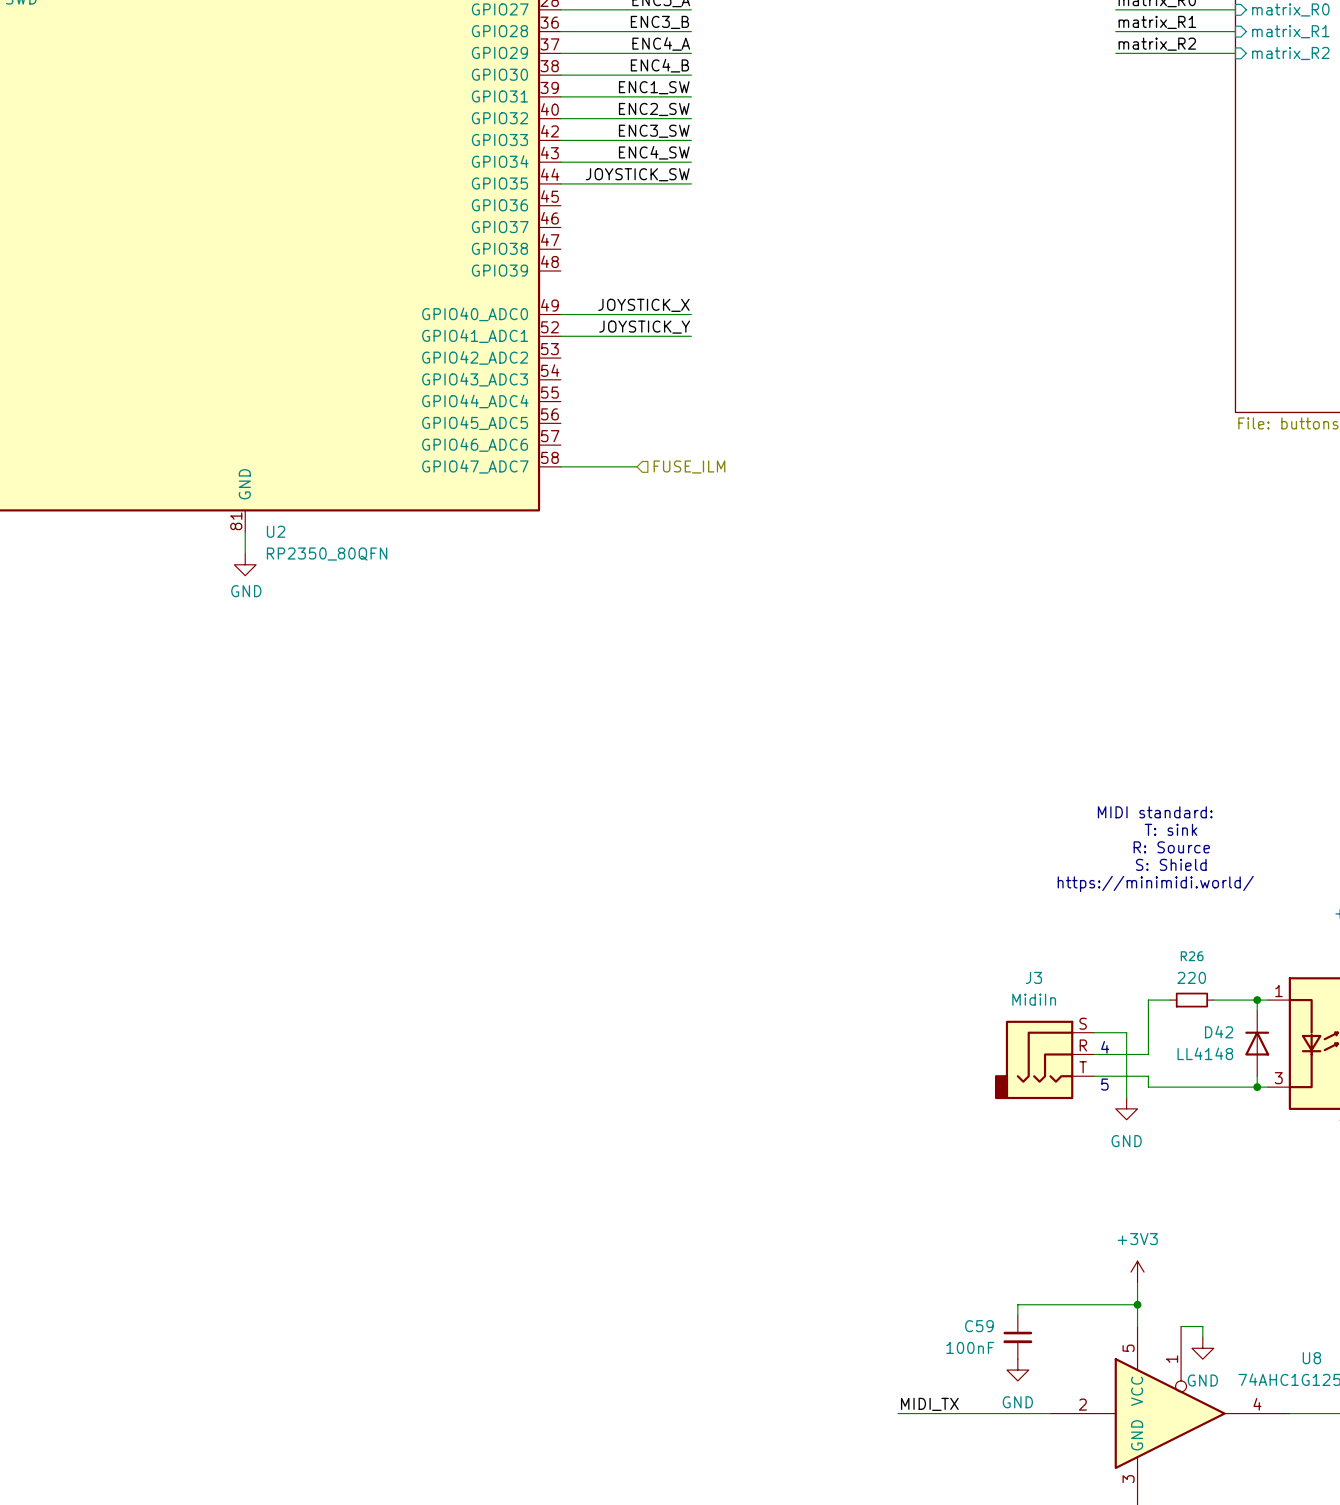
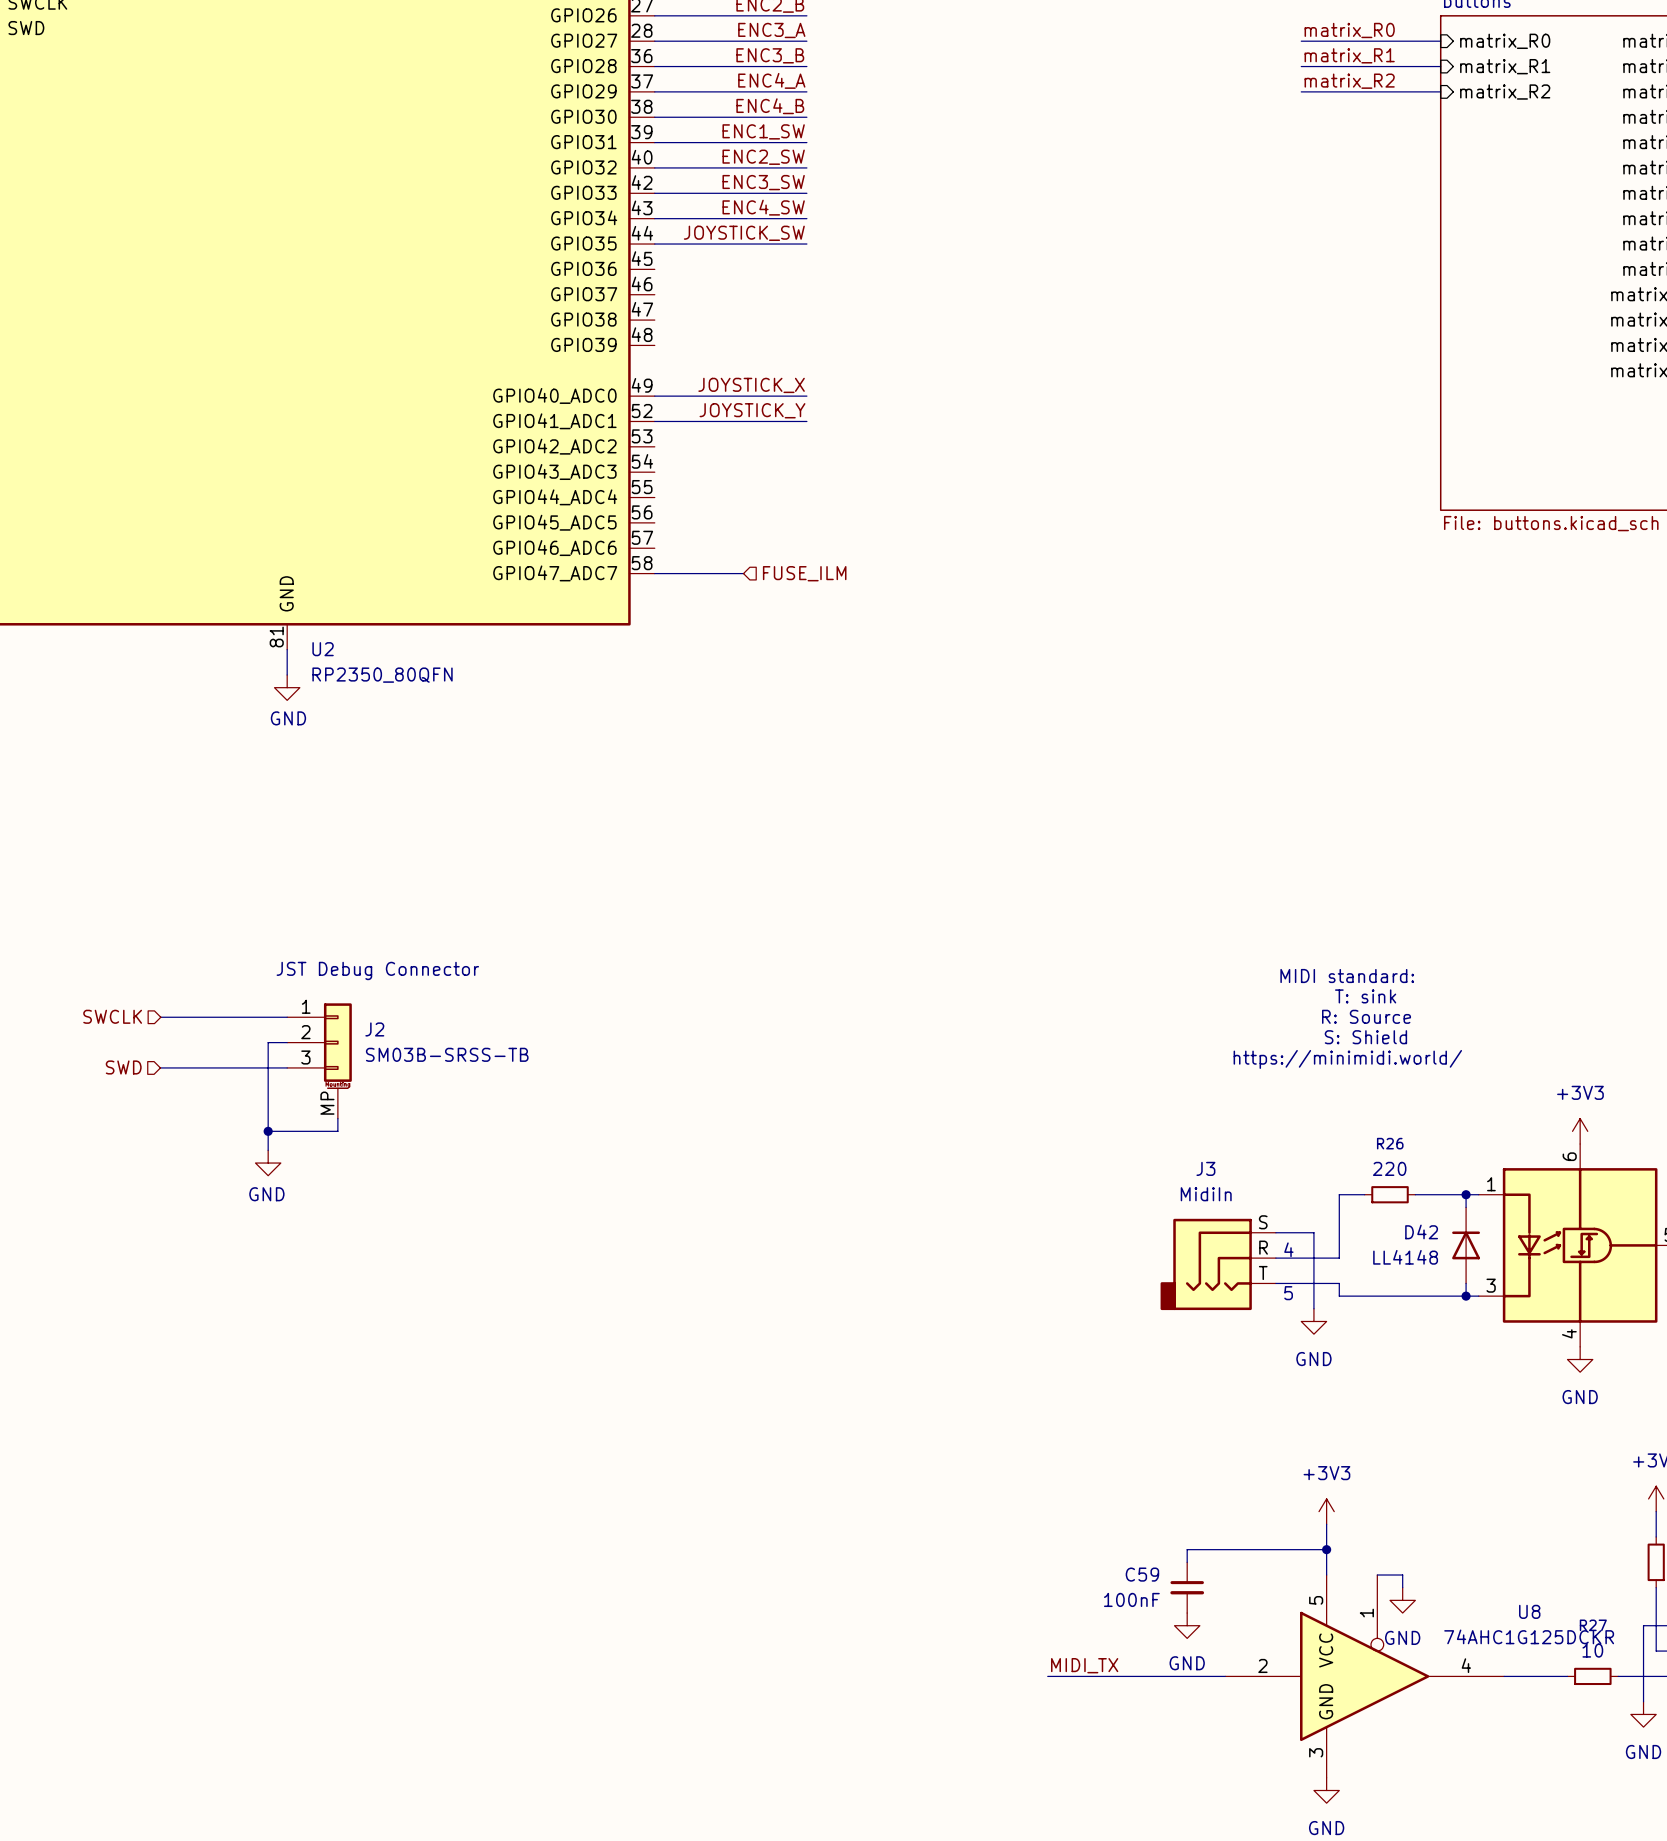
text: none -> JST Debug Connector (377, 970)
hierarchical label: none -> SWCLK (112, 1016)
wire: none -> (160, 1017) (287, 1017)
wire: none -> (287, 1042) (268, 1042) (268, 1150)
J2: none -> SM03B-SRSS-TB (319, 1060)
hierarchical label: none -> SWD (123, 1067)
wire: none -> (160, 1067) (287, 1067)
wire: none -> (337, 1118) (337, 1131) (268, 1131)
junction: none -> (268, 1131)
power symbol: none -> GND (268, 1163)

